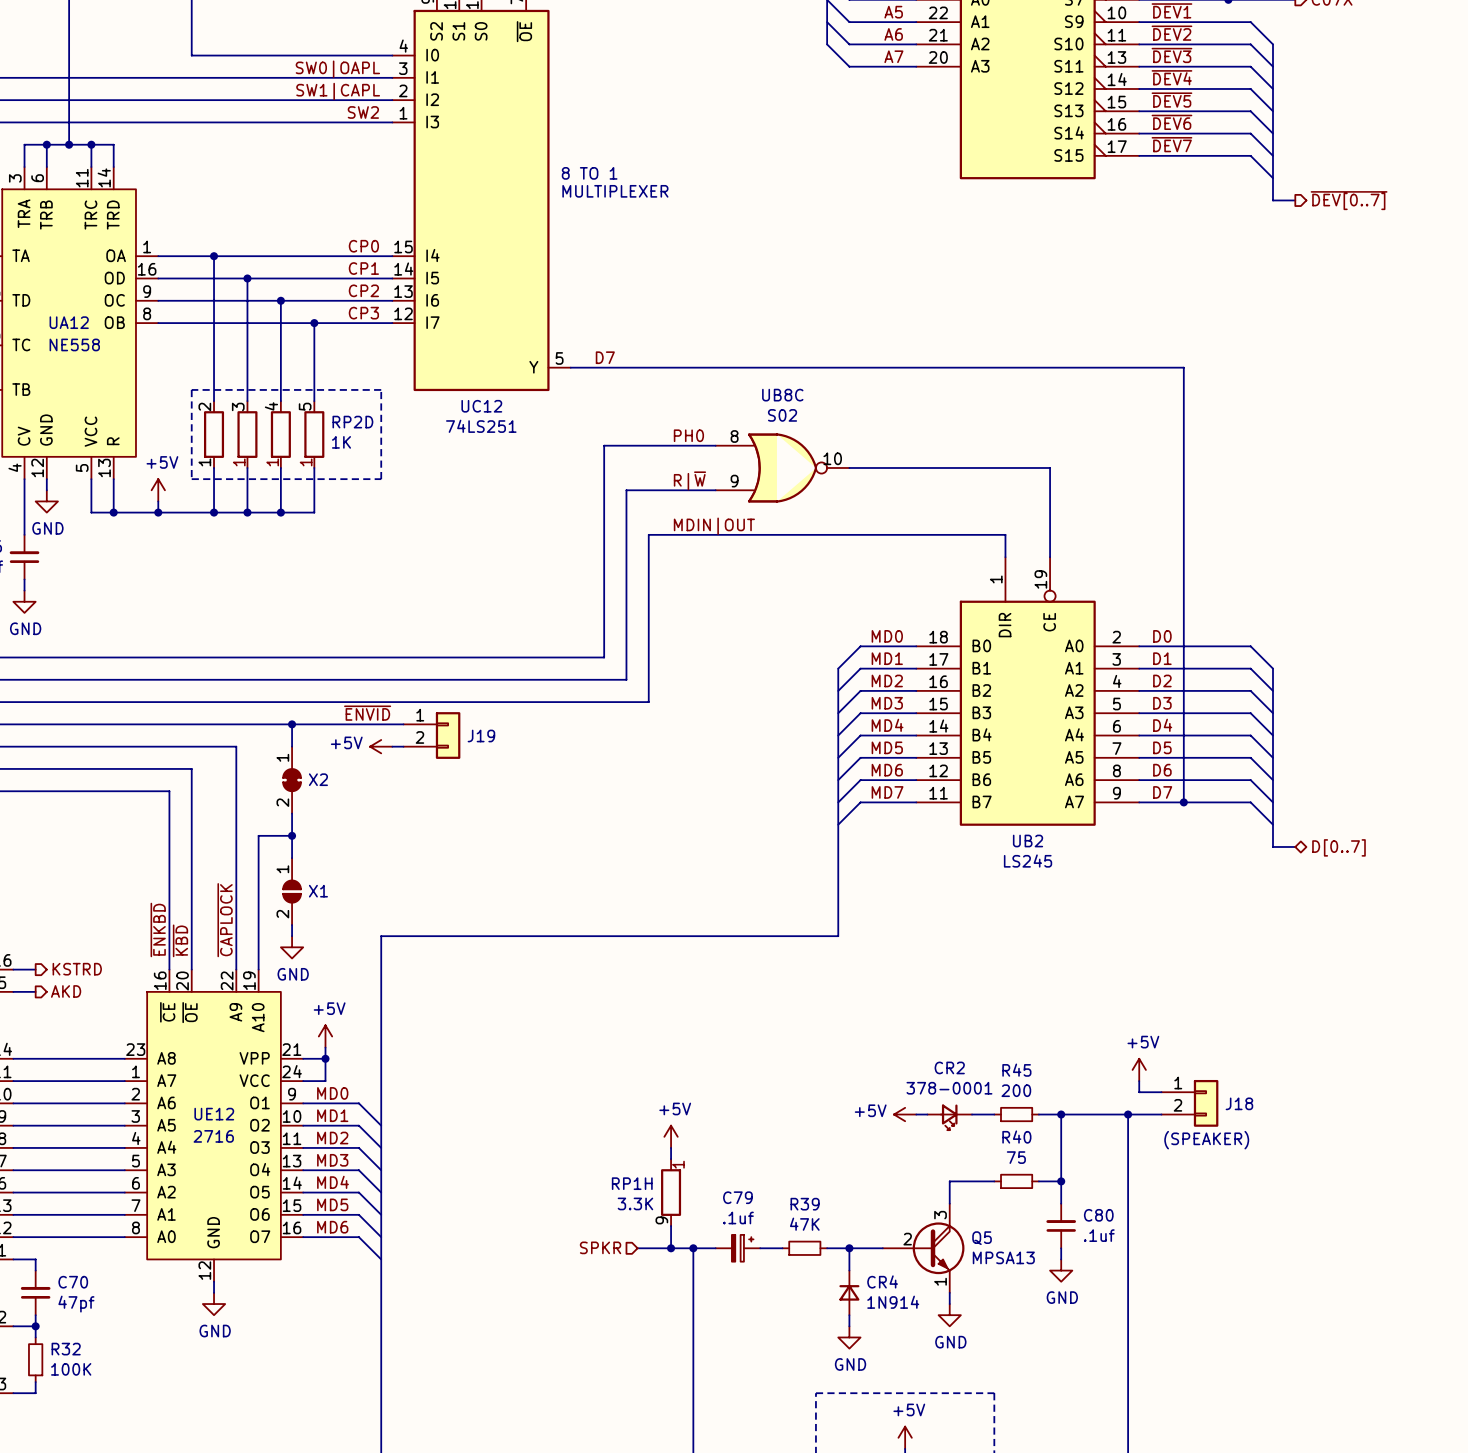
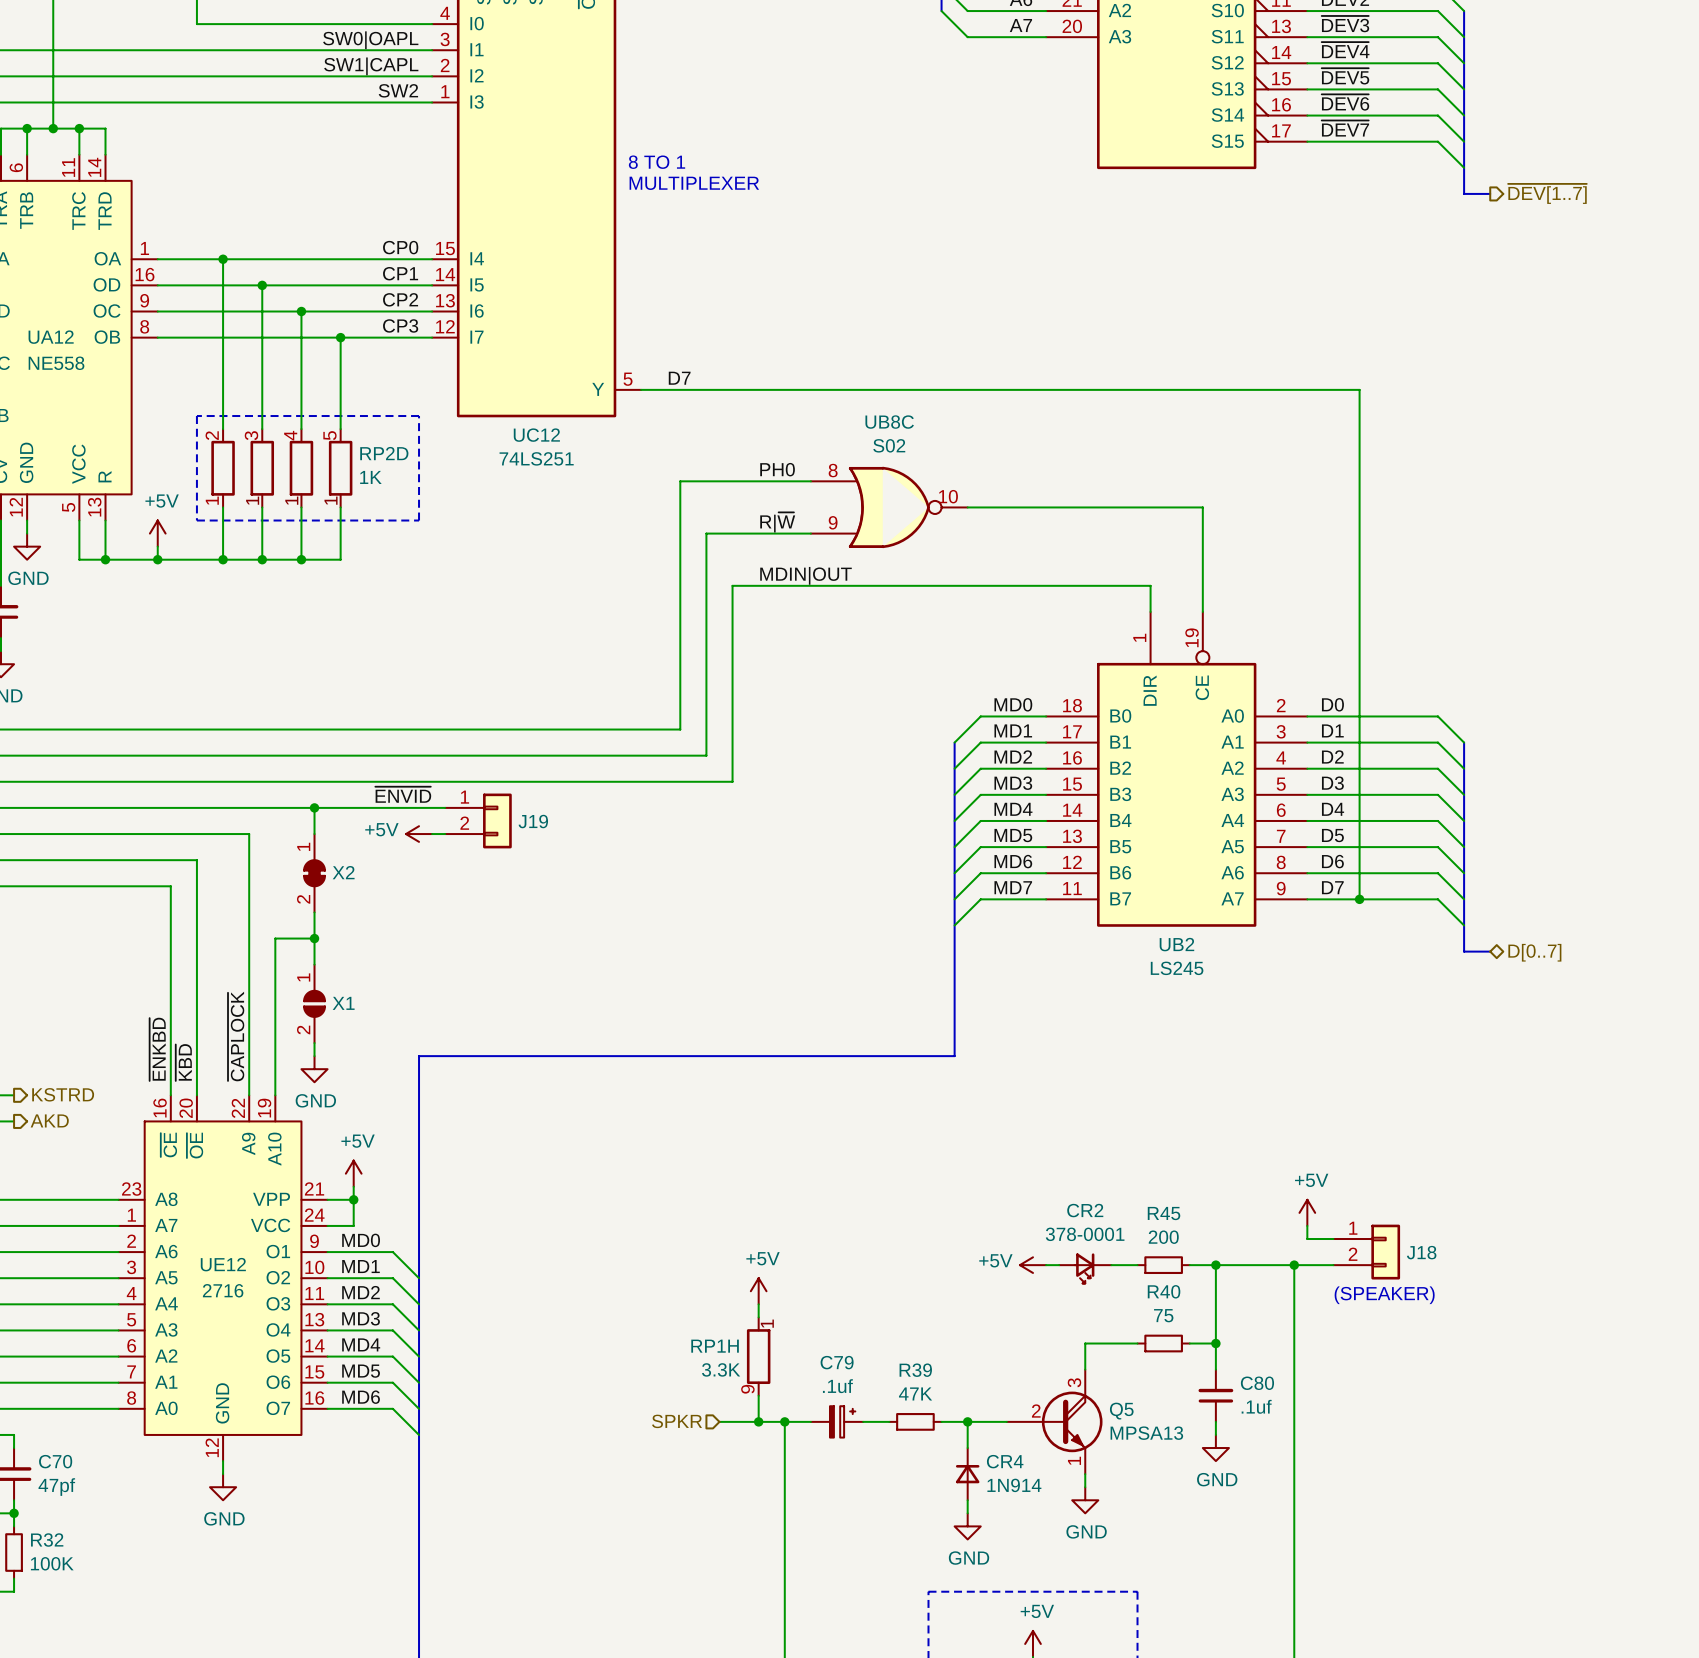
hierarchical label: ~{DEV[0..7]} (1349, 200) -> ~{DEV[1..7]} (1547, 193)

